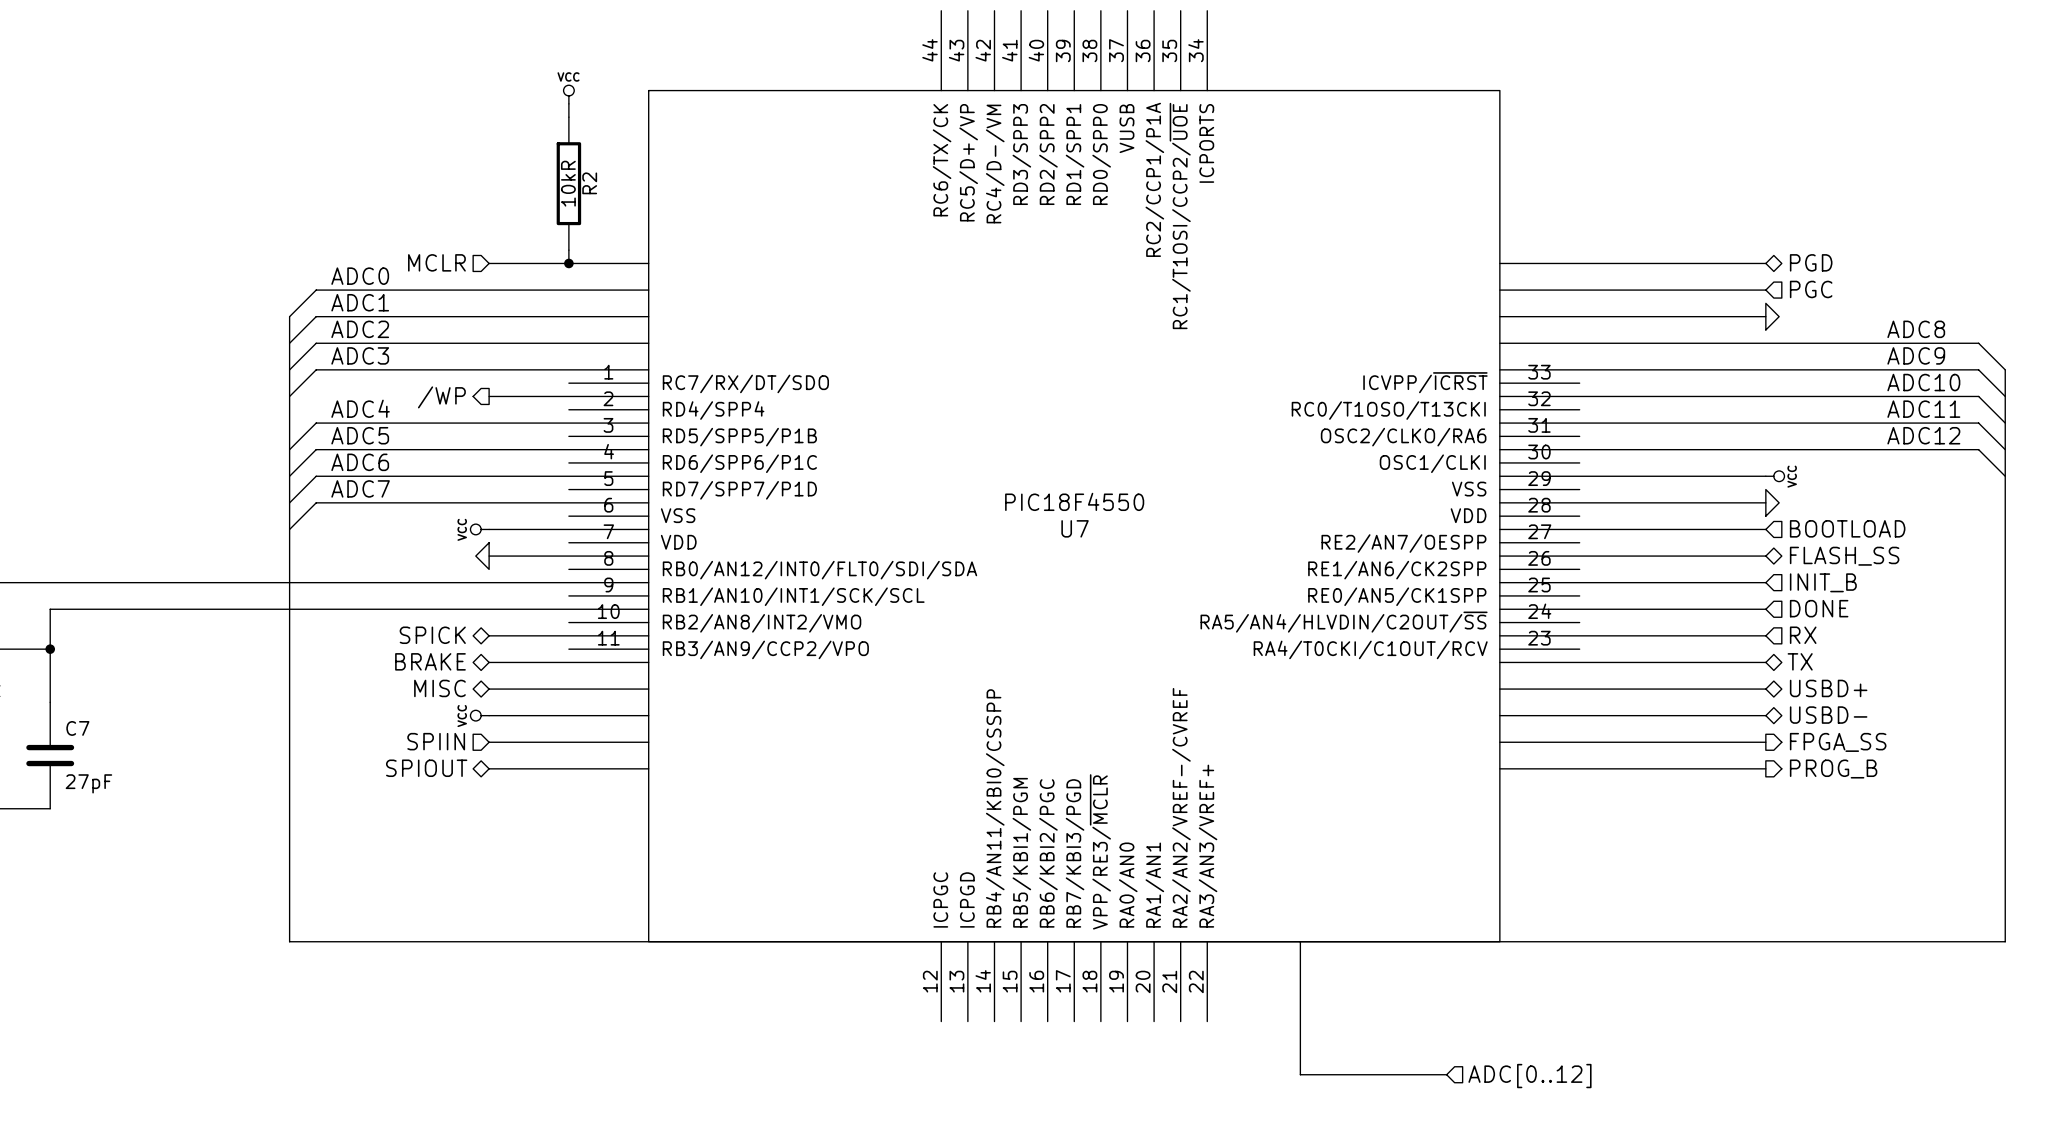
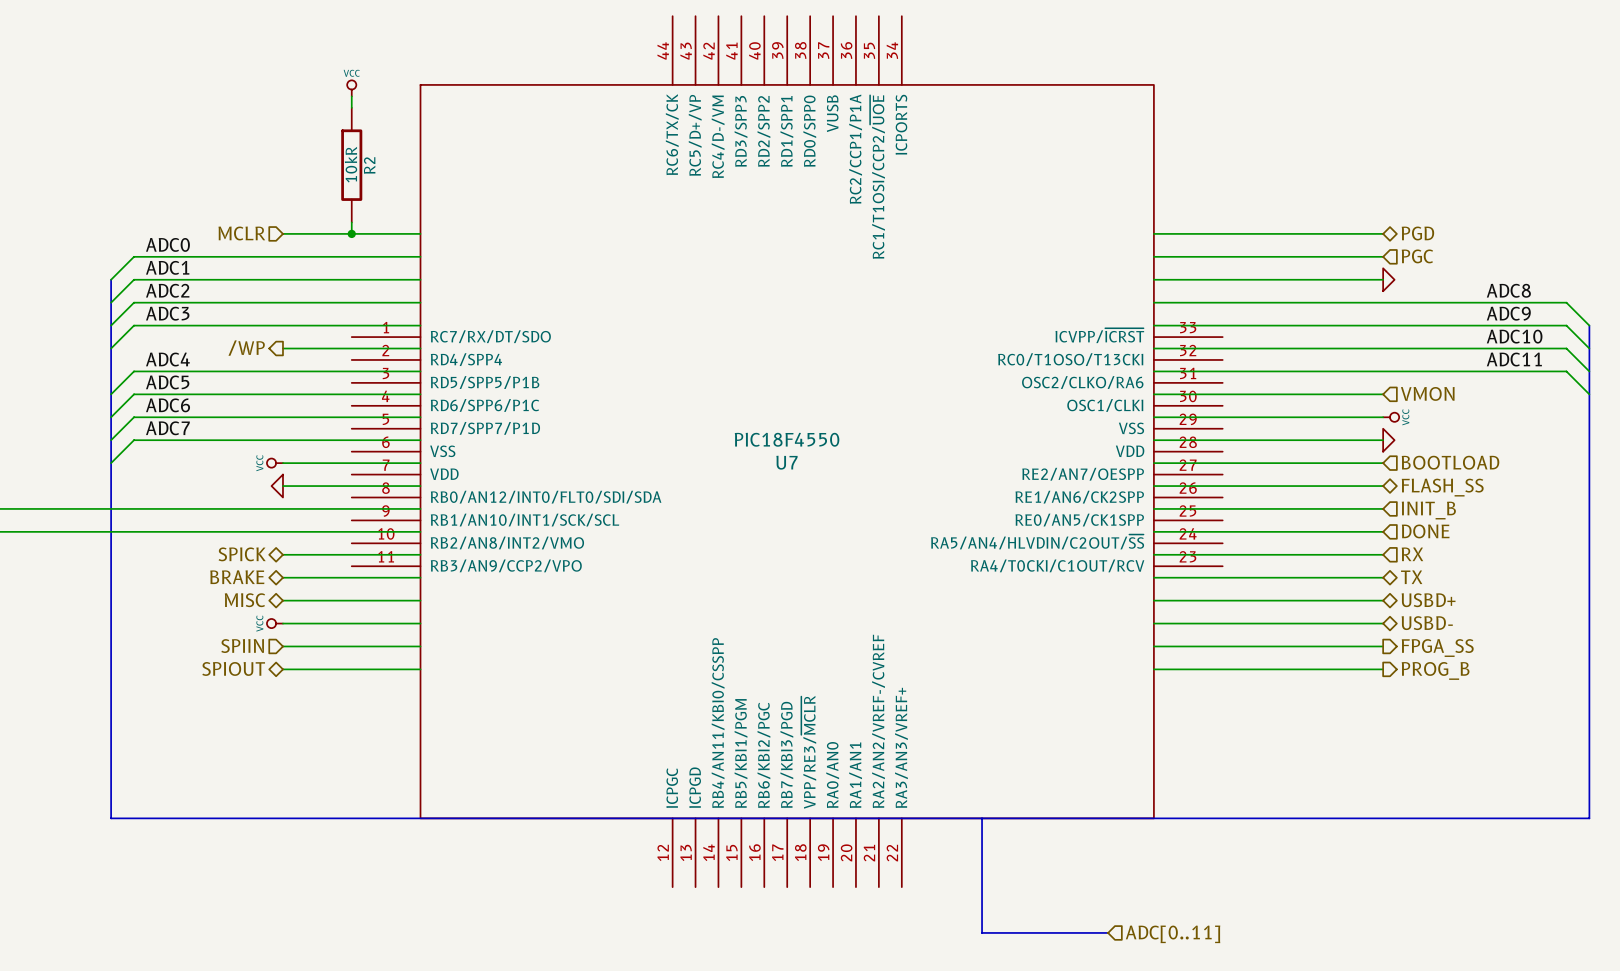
label: ADC12 (1923, 435) -> none
wire: (1765, 449) (1978, 449) (2005, 476) -> none
hierarchical label: none -> VMON (1427, 393)
hierarchical label: ADC[0..12] (1529, 1076) -> ADC[0..11] (1173, 934)

